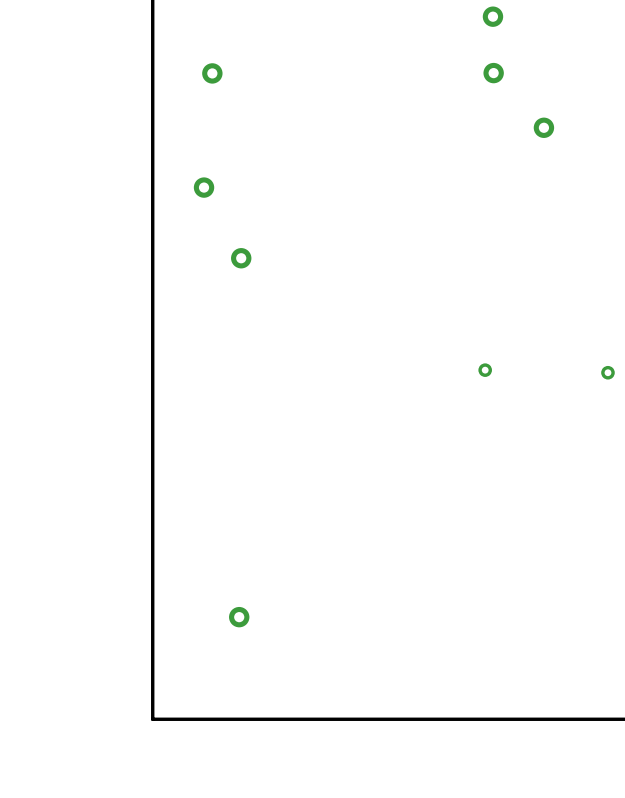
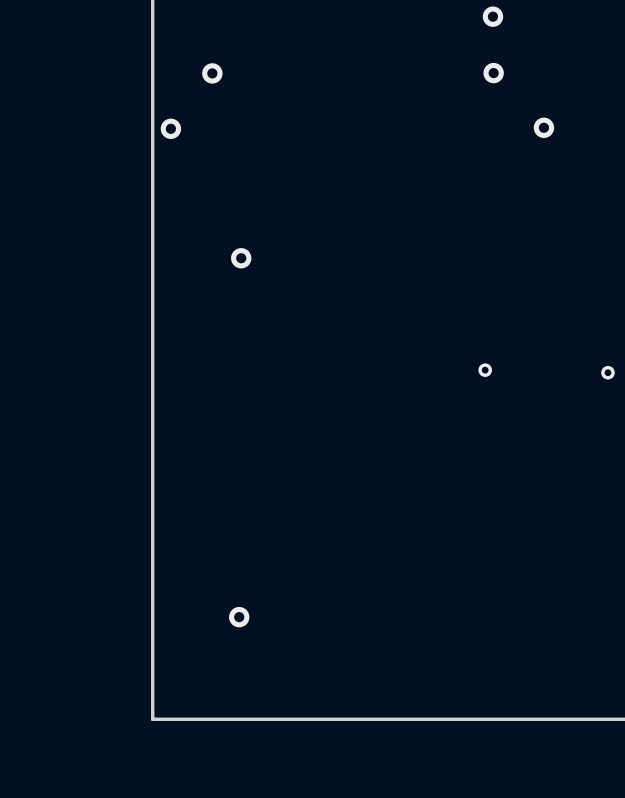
via position: (204, 187) -> (170, 128)

